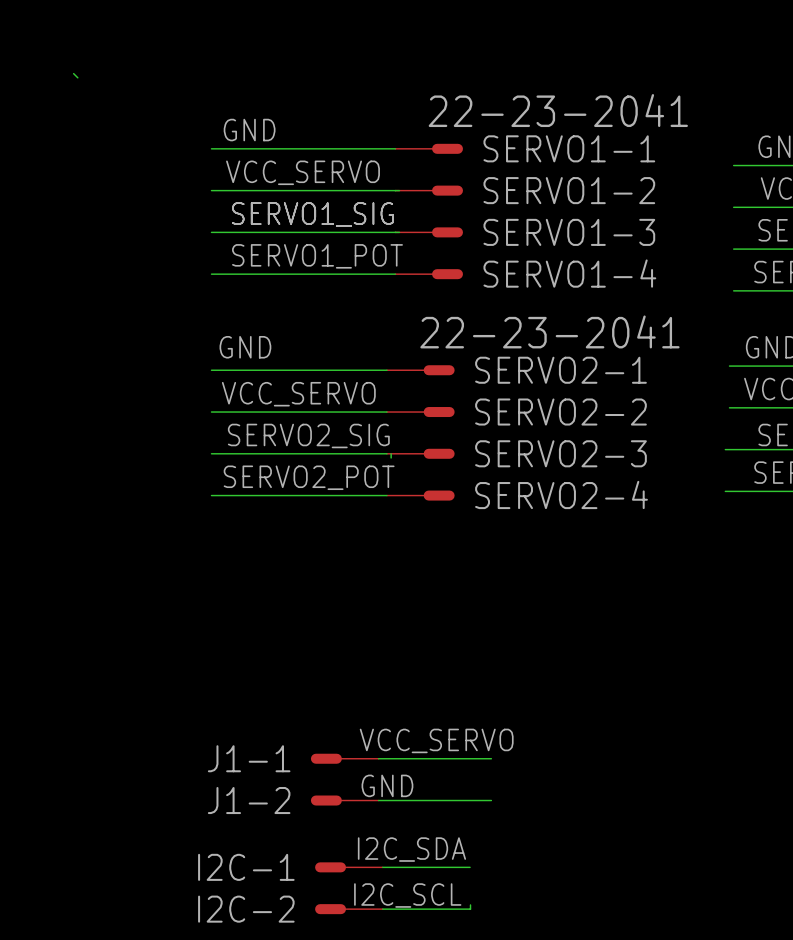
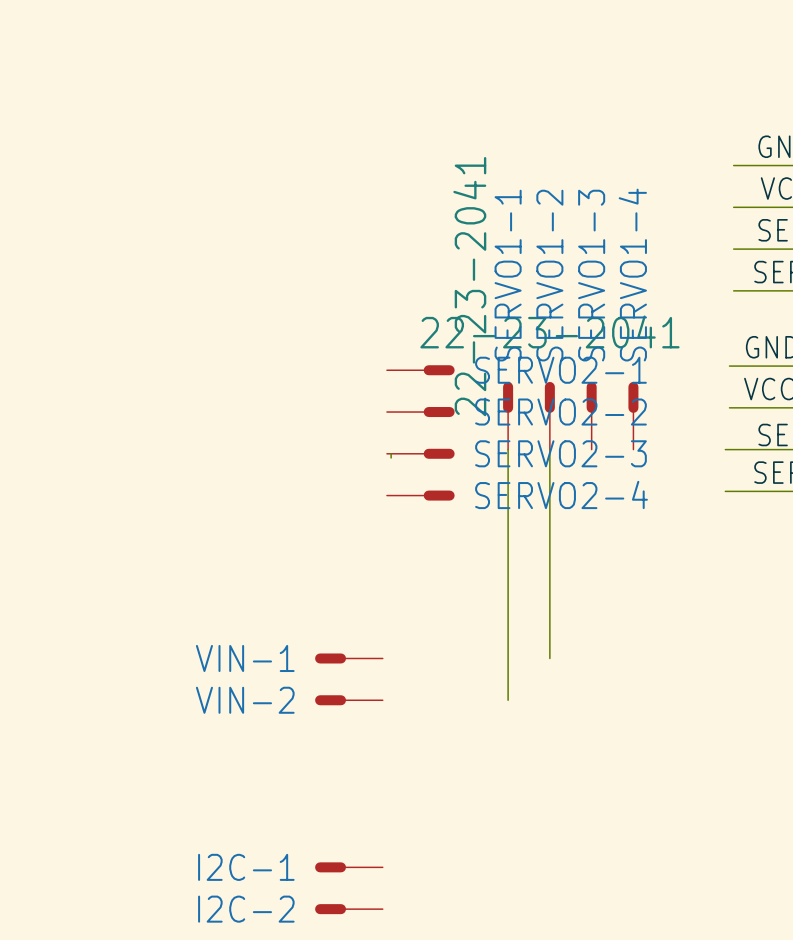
wire: (73, 73) (77, 77) -> none
label: GND (249, 130) -> none
wire: (211, 148) (395, 148) -> none
SERVO1-1 position: (429, 148) -> (508, 415)
SERVO1-1 rotation: 0° (447, 148) -> 90° counterclockwise (508, 397)
label: VCC_SERVO (303, 172) -> none
wire: (211, 190) (399, 190) -> none
SERVO1-2 position: (429, 190) -> (549, 415)
SERVO1-2 rotation: 0° (447, 190) -> 90° counterclockwise (549, 397)
label: SERVO1_SIG (313, 214) -> none
wire: (211, 232) (399, 232) -> none
SERVO1-3 position: (429, 232) -> (591, 415)
SERVO1-3 rotation: 0° (447, 232) -> 90° counterclockwise (591, 397)
label: SERVO1_POT (317, 256) -> none
wire: (211, 274) (395, 274) -> none
SERVO1-4 position: (429, 274) -> (633, 415)
SERVO1-4 rotation: 0° (447, 274) -> 90° counterclockwise (633, 397)
label: GND (245, 347) -> none
wire: (211, 370) (386, 370) -> none
label: VCC_SERVO (298, 394) -> none
wire: (211, 412) (386, 412) -> none
label: SERVO2_SIG (308, 435) -> none
wire: none -> (508, 449) (508, 700)
wire: none -> (549, 449) (549, 658)
wire: (211, 453) (386, 453) -> none
label: SERVO2_POT (309, 477) -> none
wire: (211, 495) (386, 495) -> none
VIN-1: none -> (348, 658)
VIN-2: none -> (348, 700)
label: VCC_SERVO (436, 740) -> none
J1-1: (344, 758) -> none
wire: (378, 758) (491, 758) -> none
label: GND (387, 785) -> none
J1-2: (344, 800) -> none
wire: (378, 800) (491, 800) -> none
label: I2C_SDA (411, 849) -> none
wire: (382, 867) (470, 867) -> none
label: I2C_SCL (407, 895) -> none
wire: (470, 904) (470, 909) (382, 909) -> none

